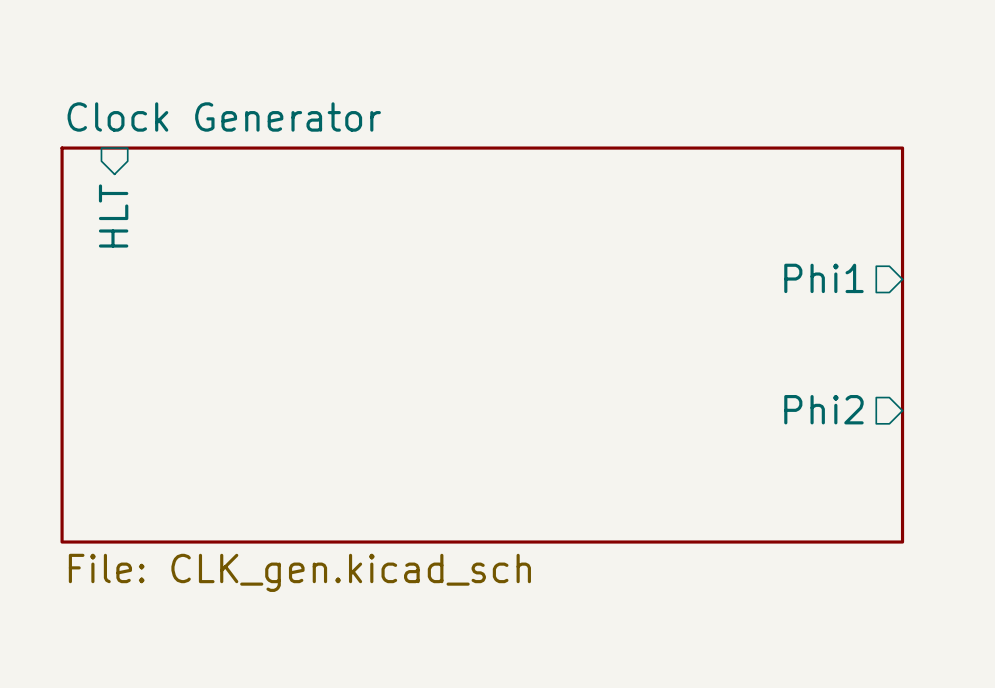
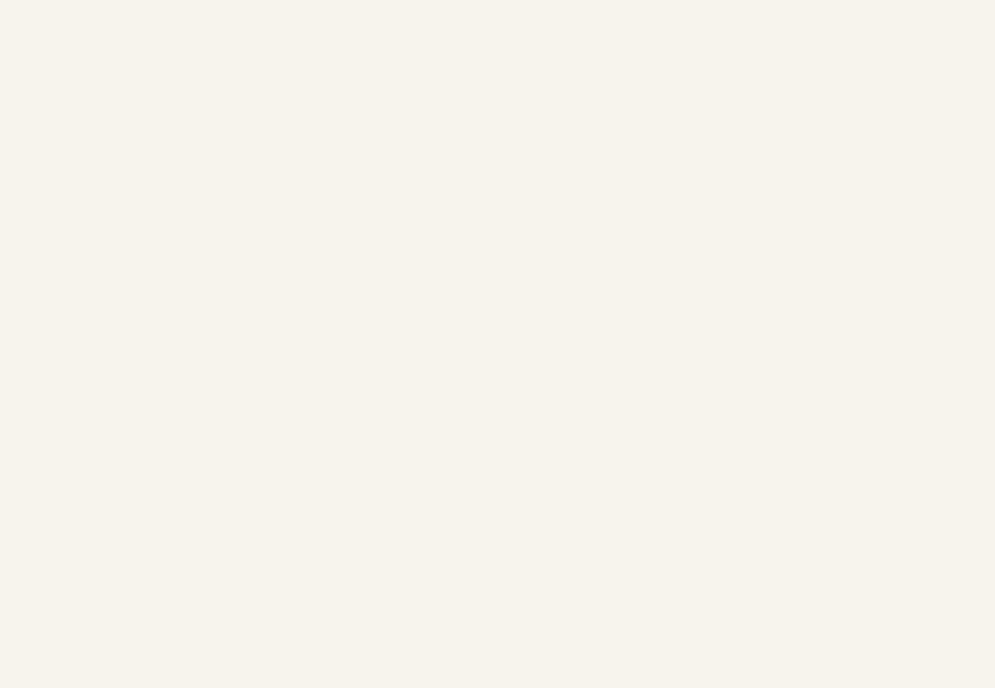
sheet pin: HLT (113, 216) -> none
sheet pin: Phi1 (823, 278) -> none
sheet Clock Generator: File: CLK_gen.kicad_sch (482, 345) -> none
sheet pin: Phi2 (823, 409) -> none

